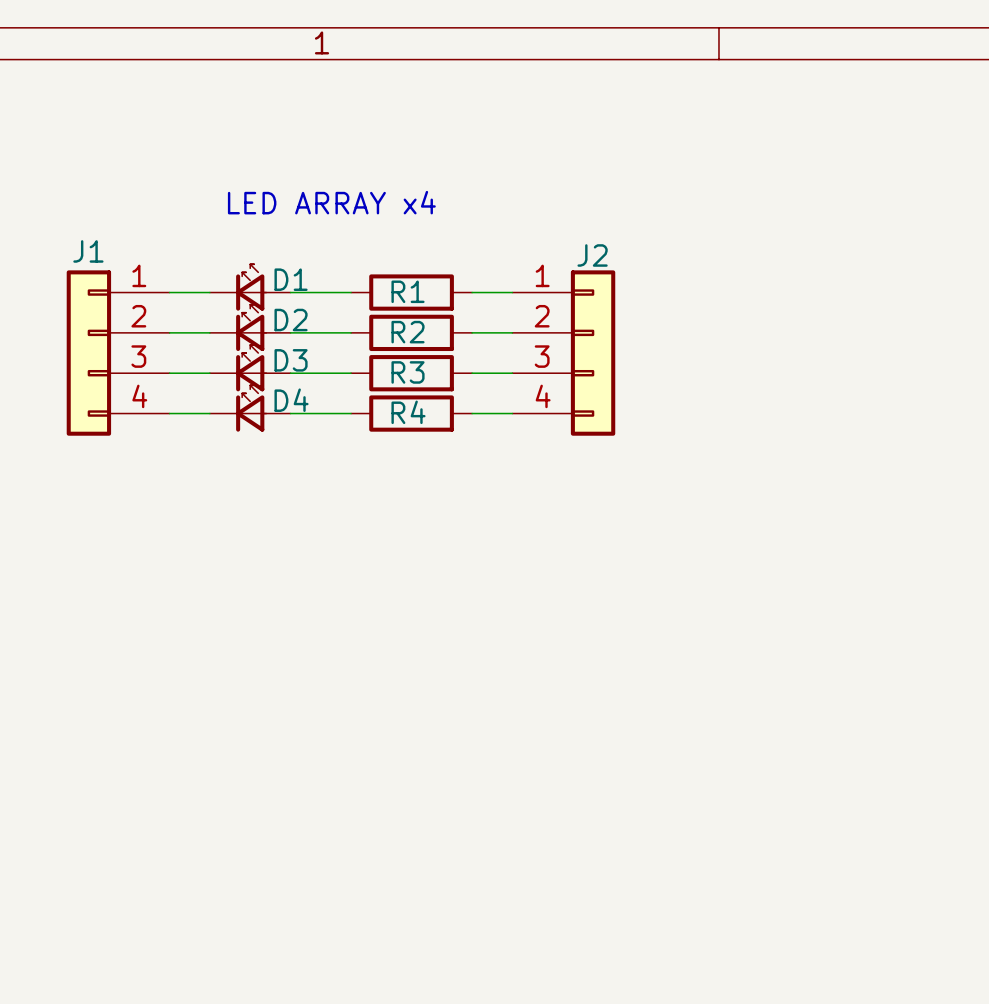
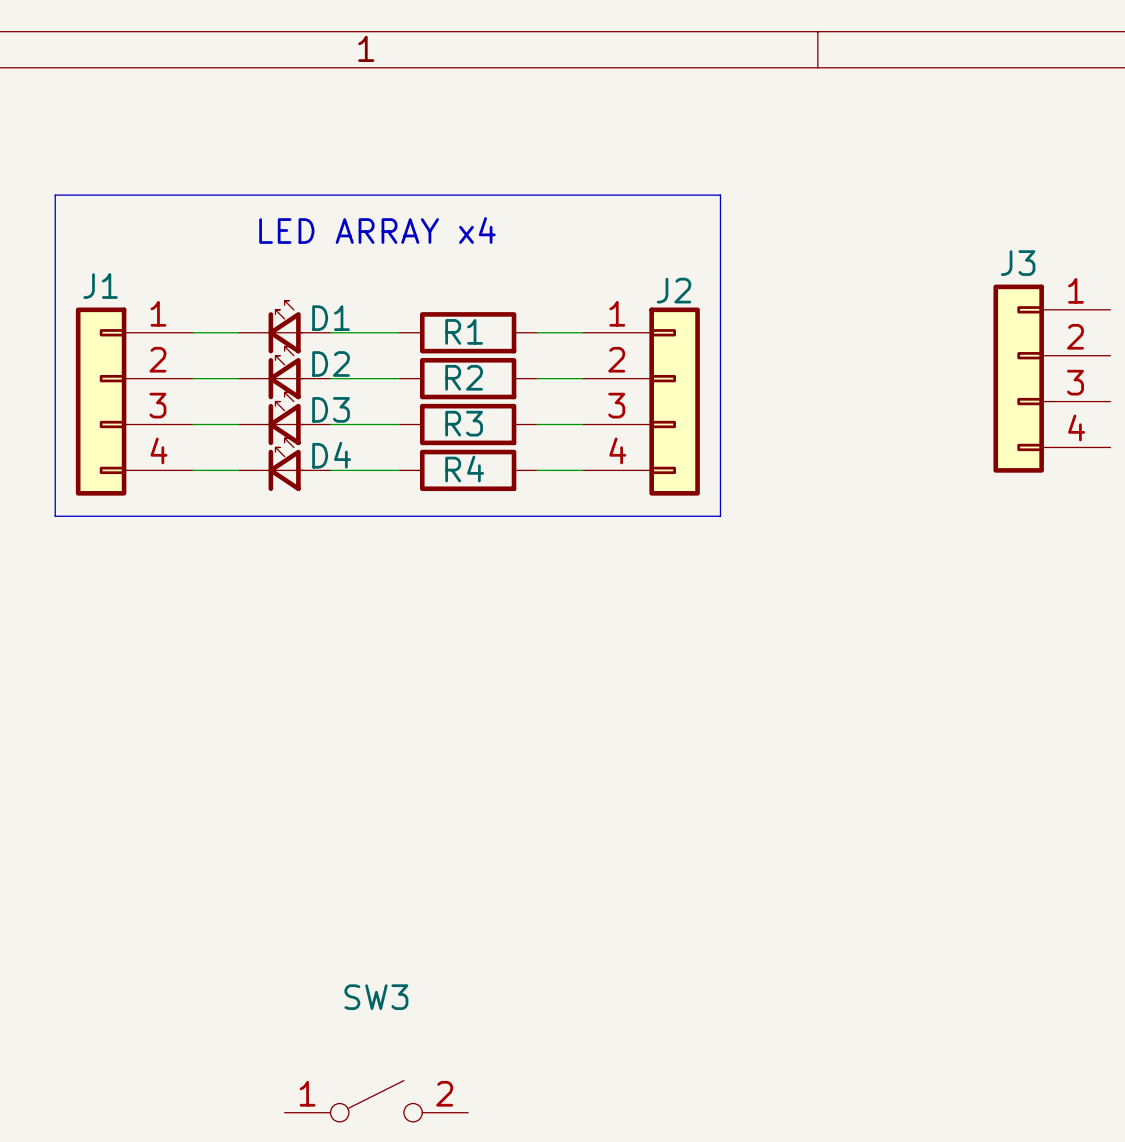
line: none -> (55, 195) (720, 195) (720, 516) (55, 516) (55, 195)
J3: none -> (1051, 378)
SW3: none -> (376, 1101)

